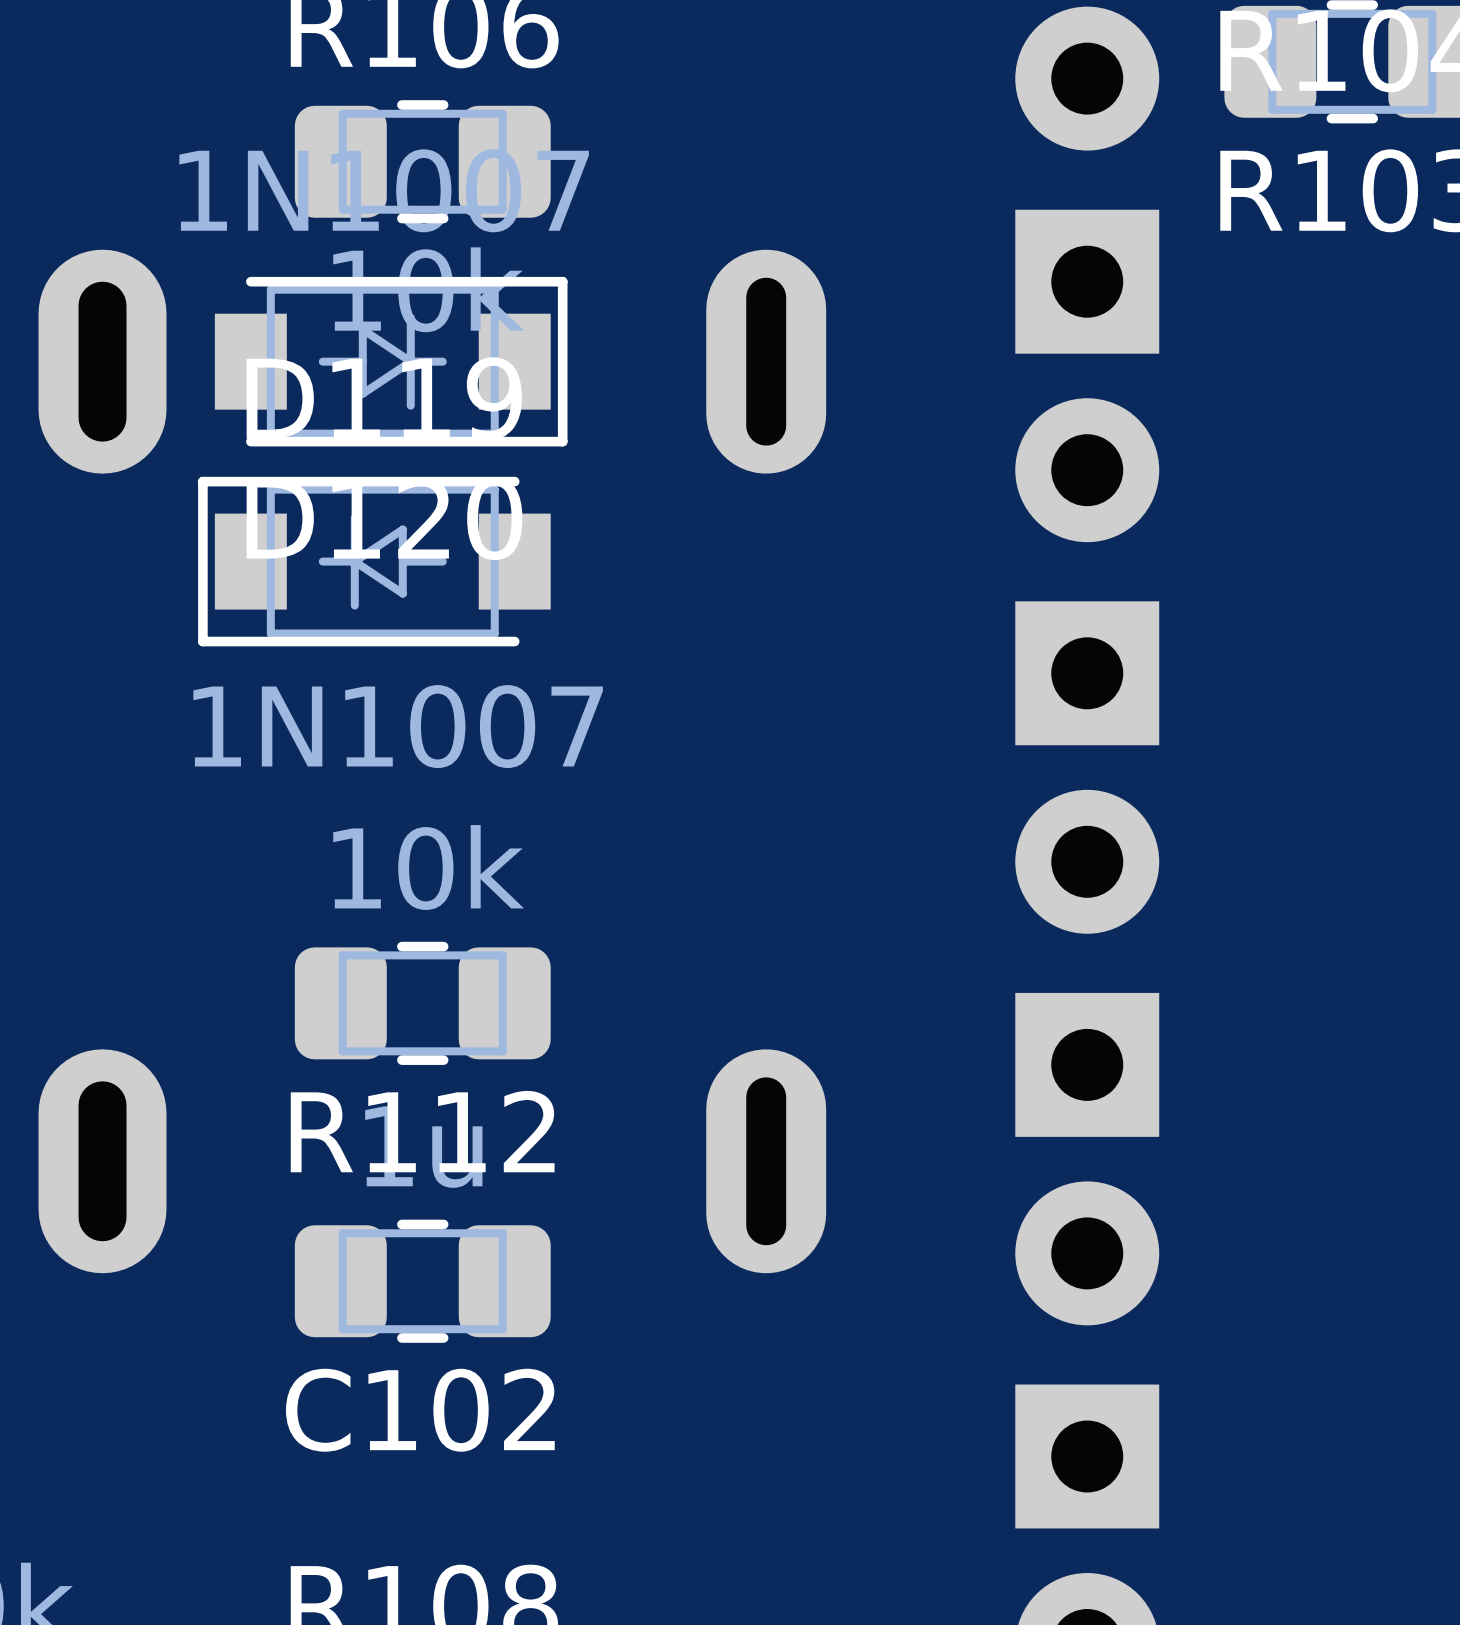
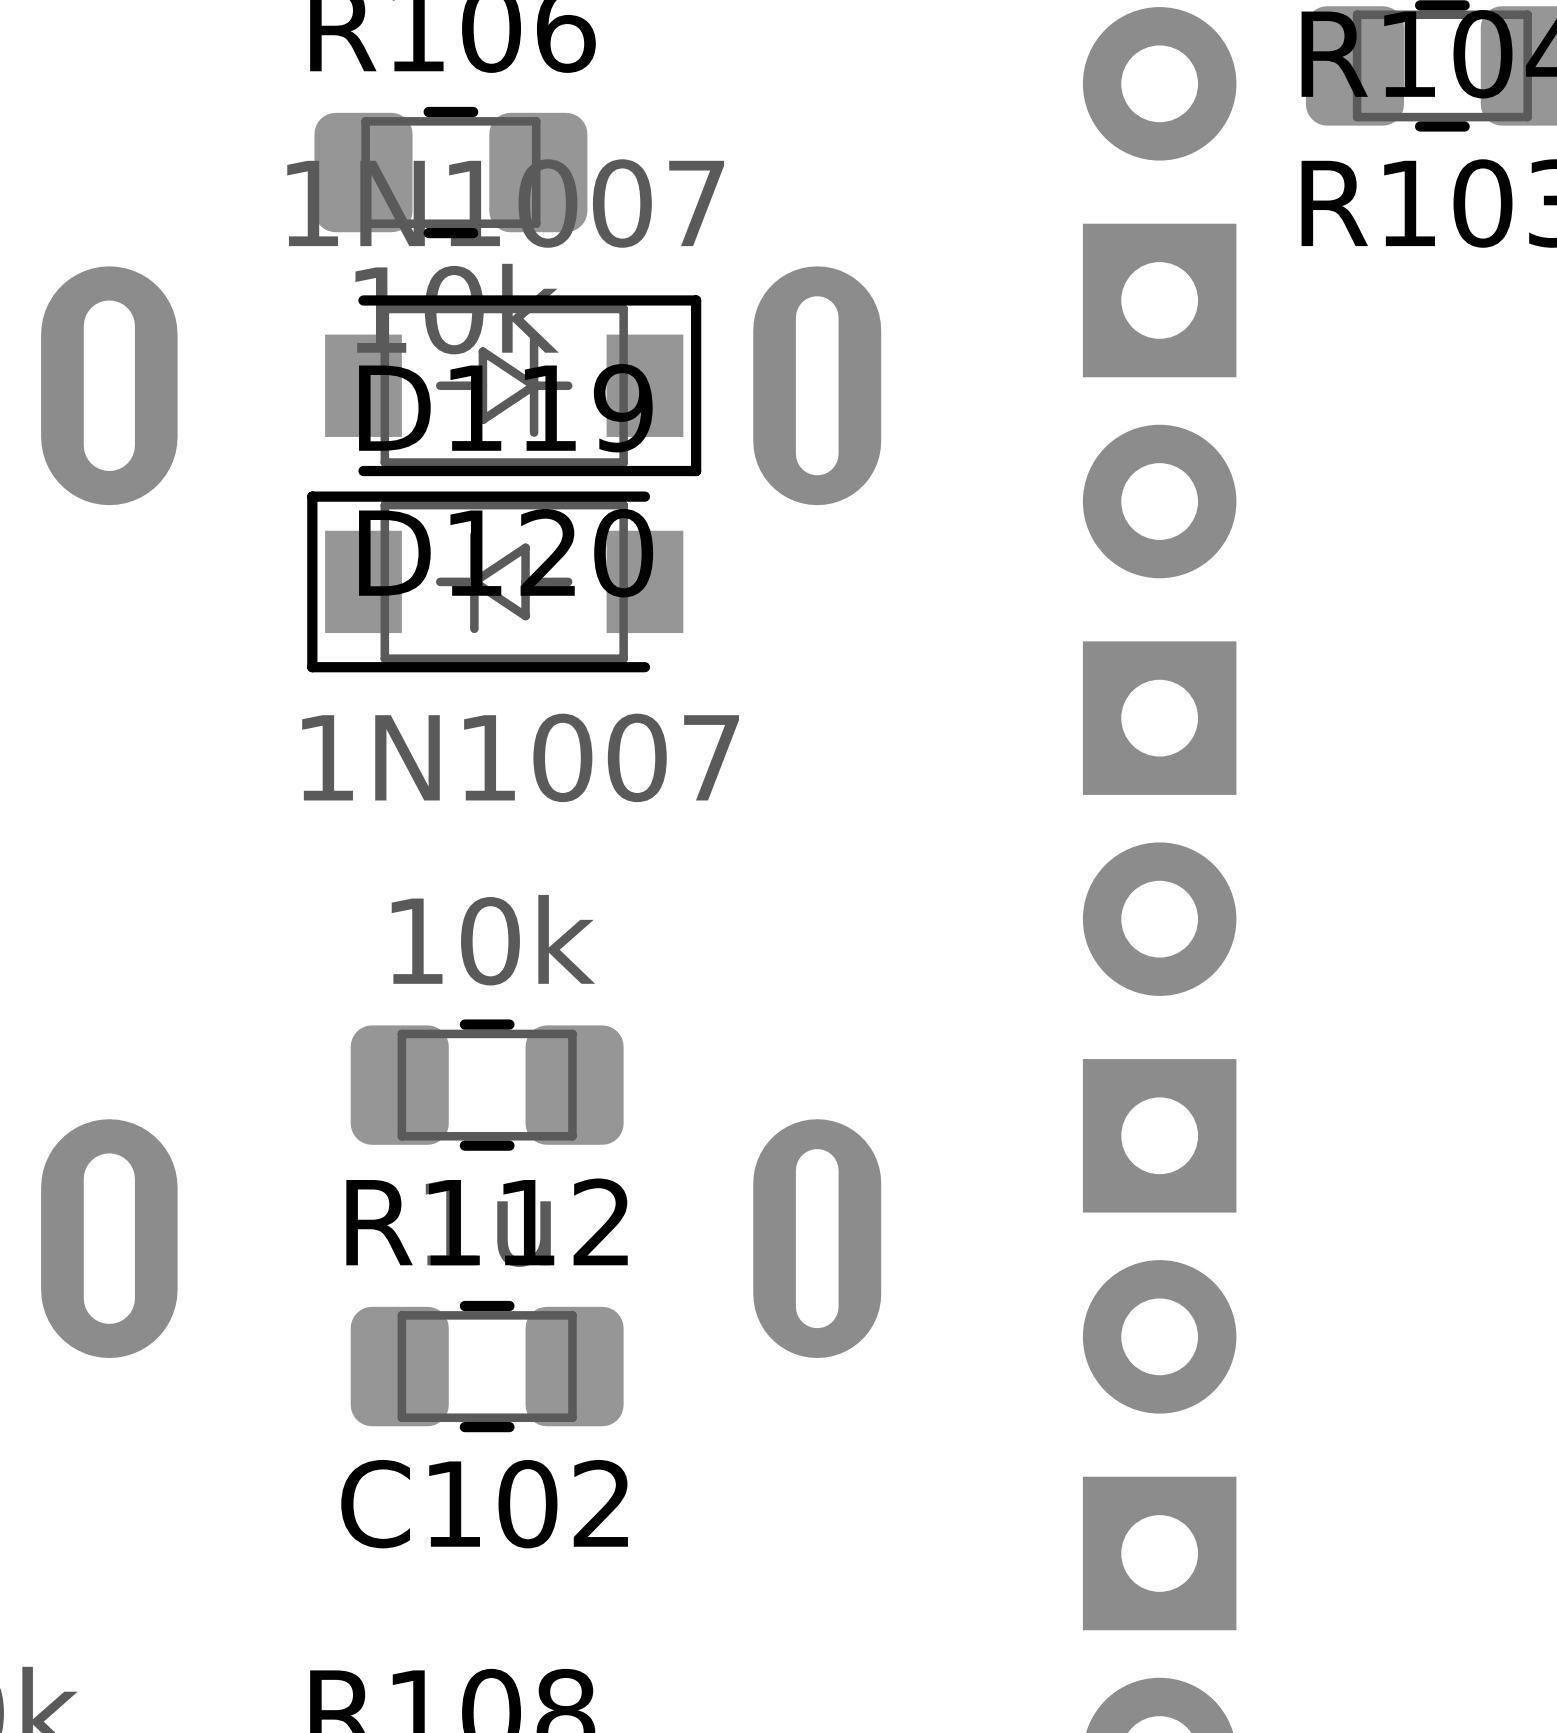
D120 position: (391, 361) -> (513, 385)
D119 position: (374, 561) -> (495, 581)
R112 position: (422, 1003) -> (487, 1085)
C102 position: (422, 1281) -> (487, 1366)

